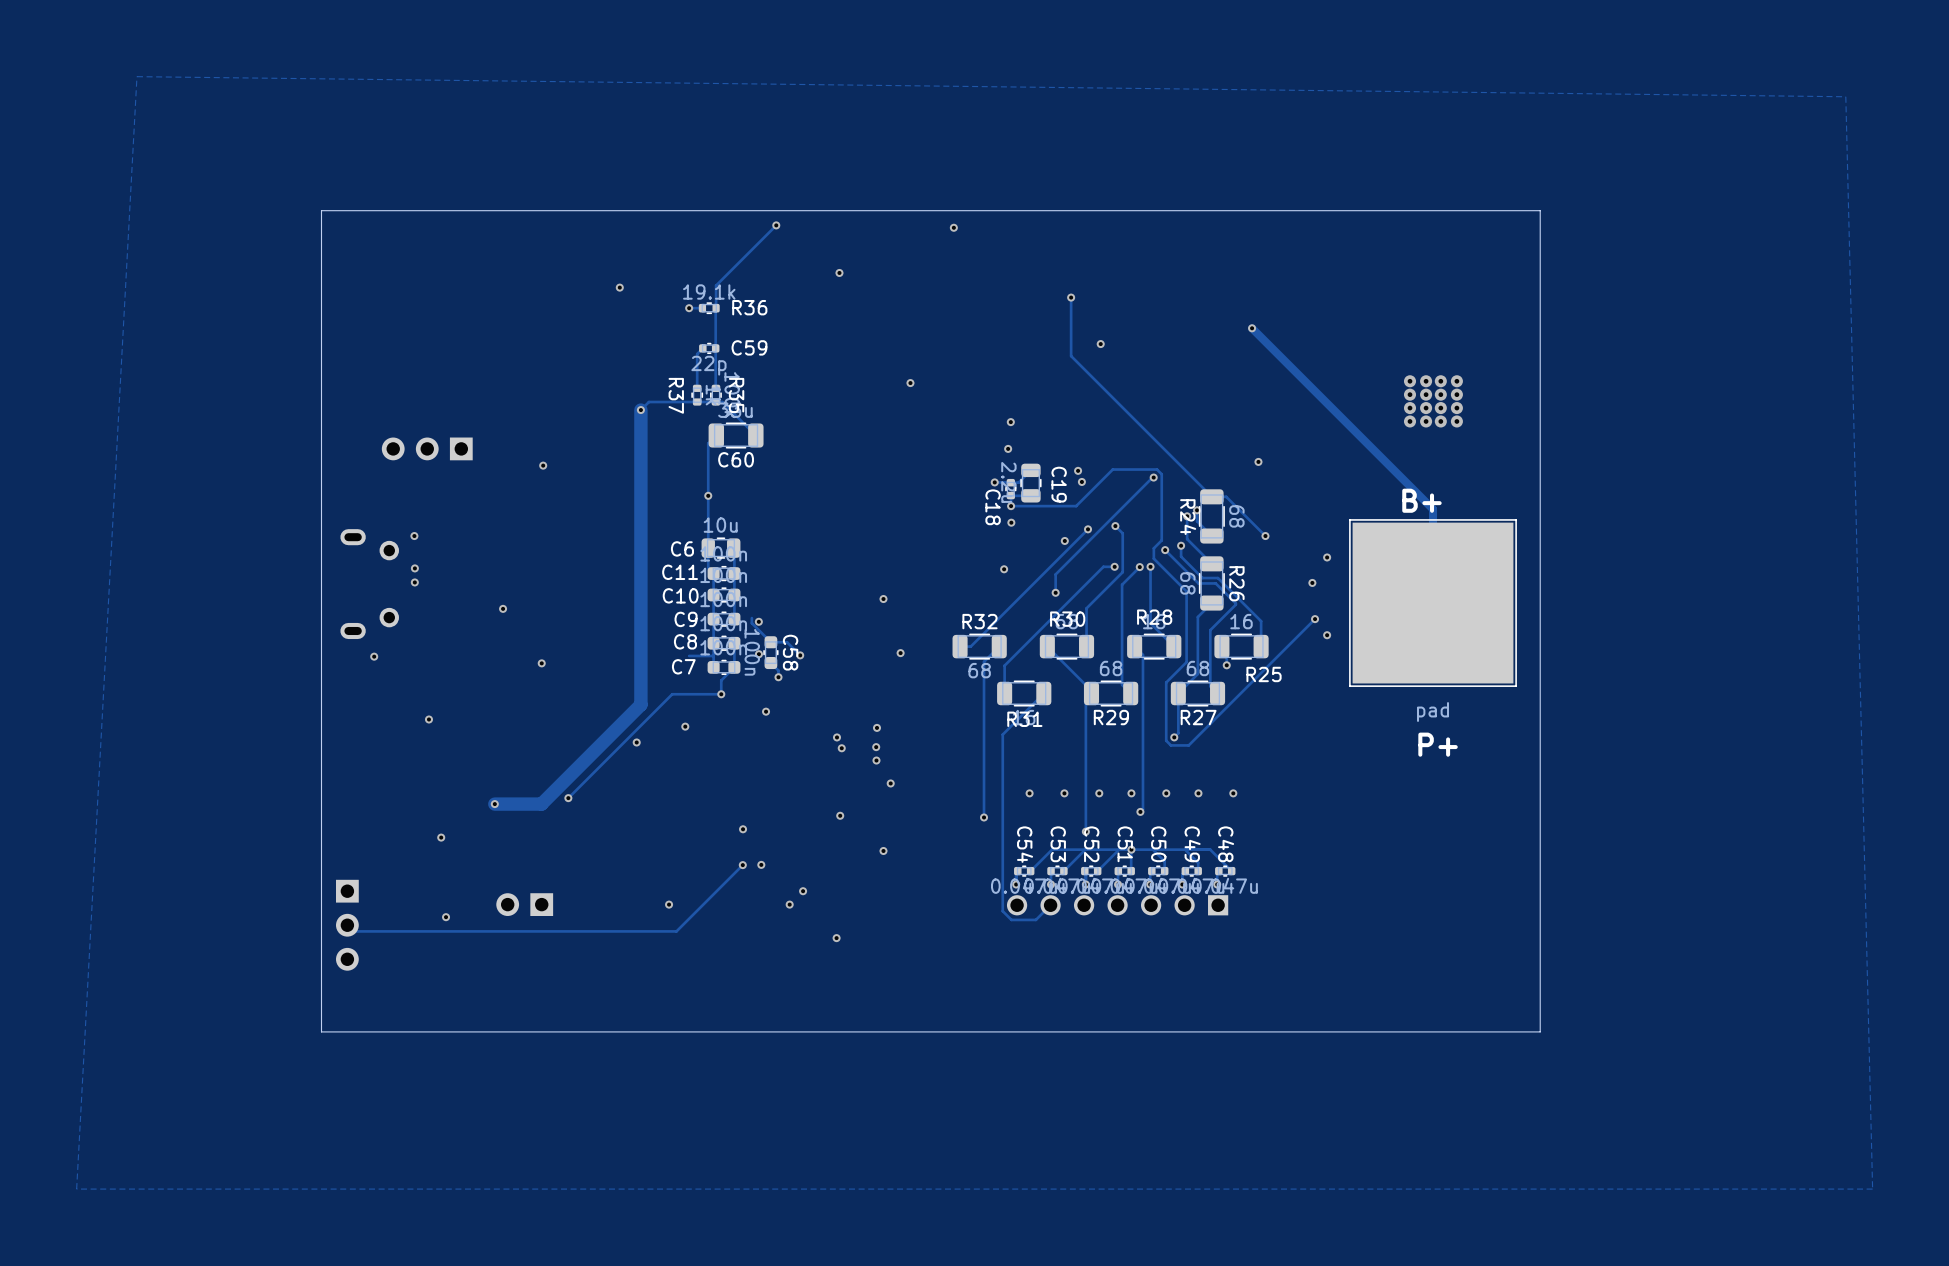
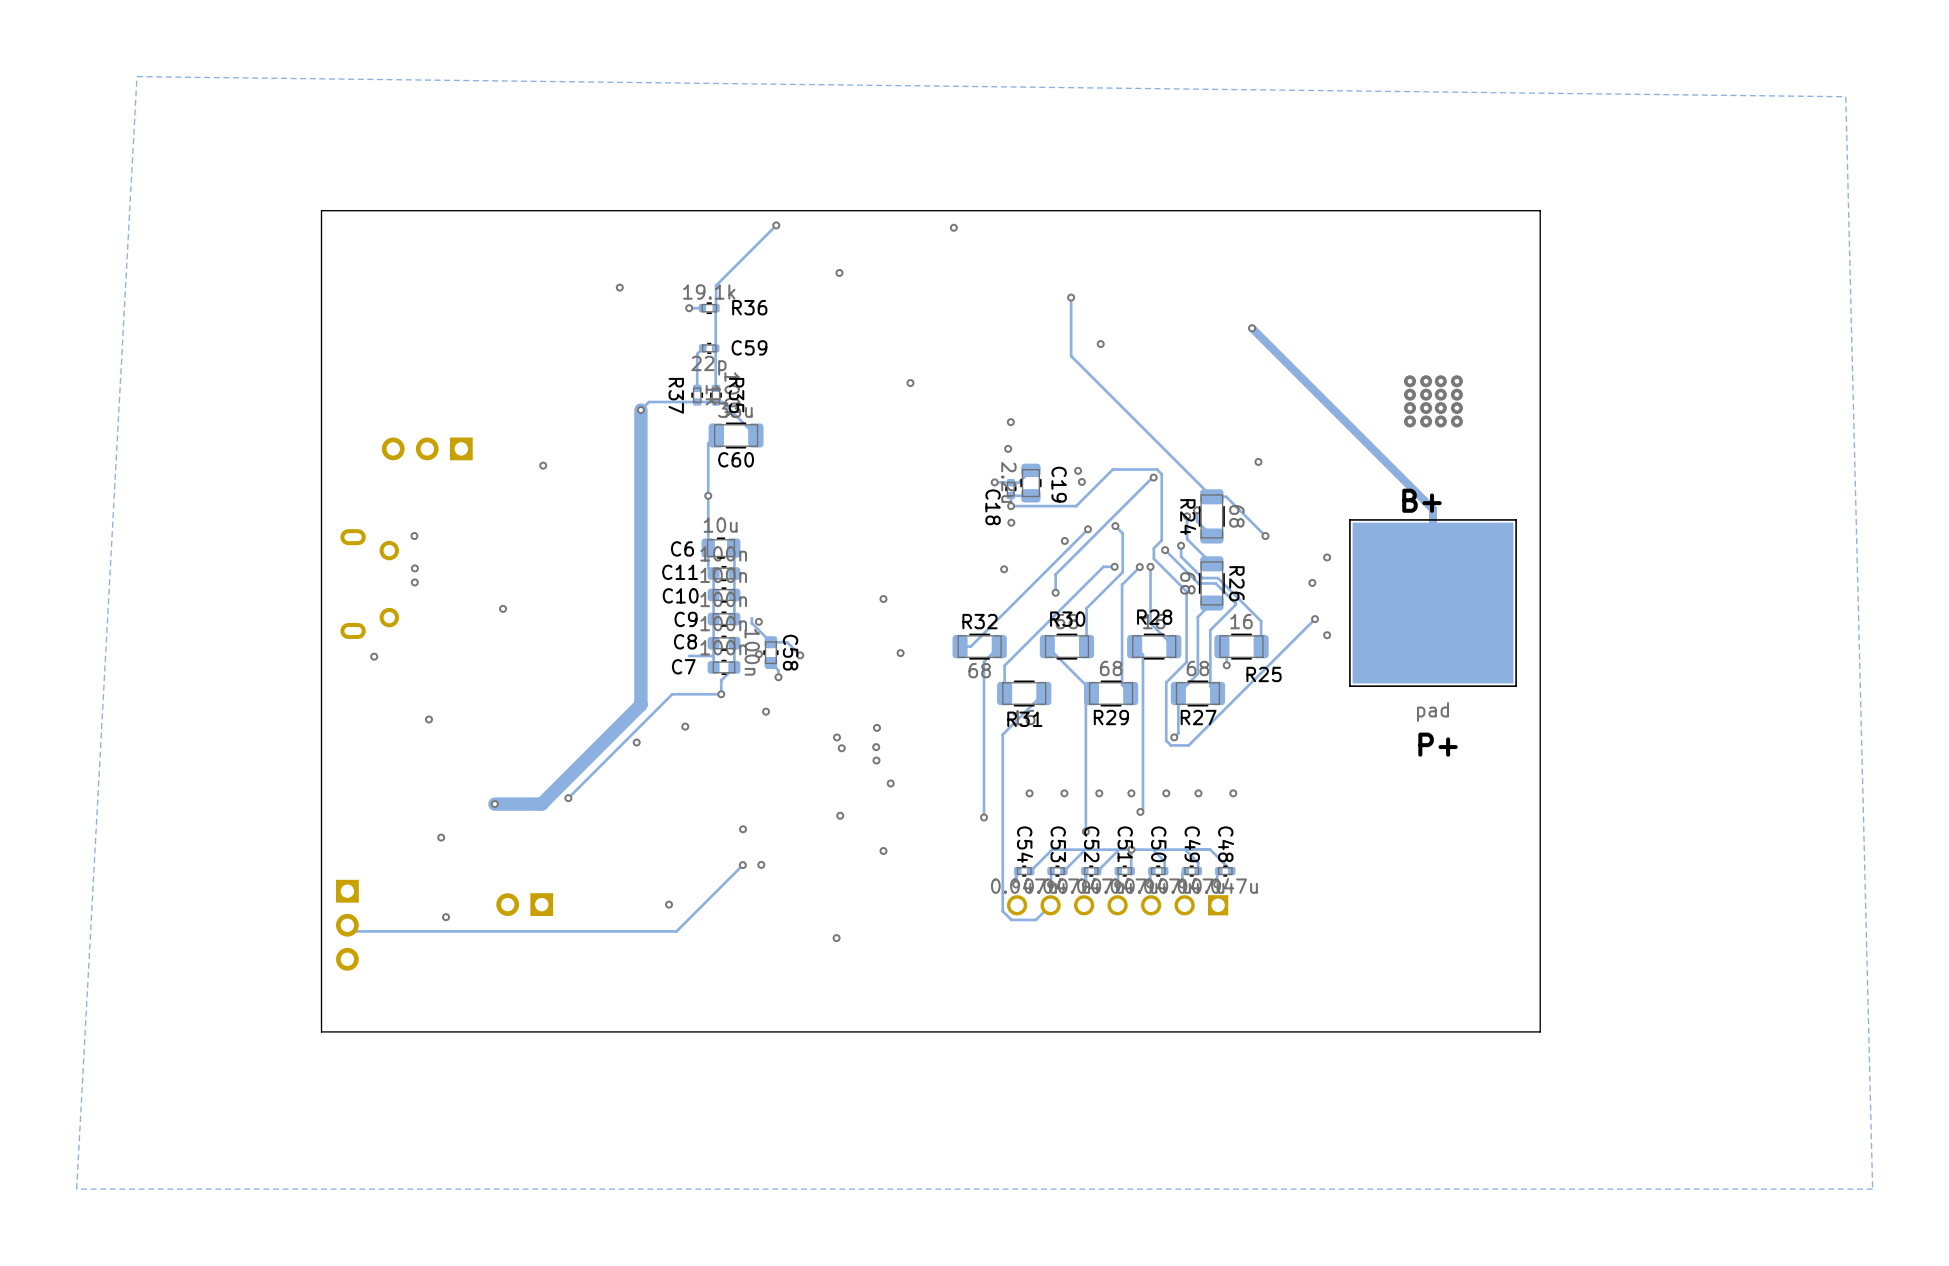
via: (541, 663) -> none
via: (803, 891) -> none
via: (789, 904) -> none

